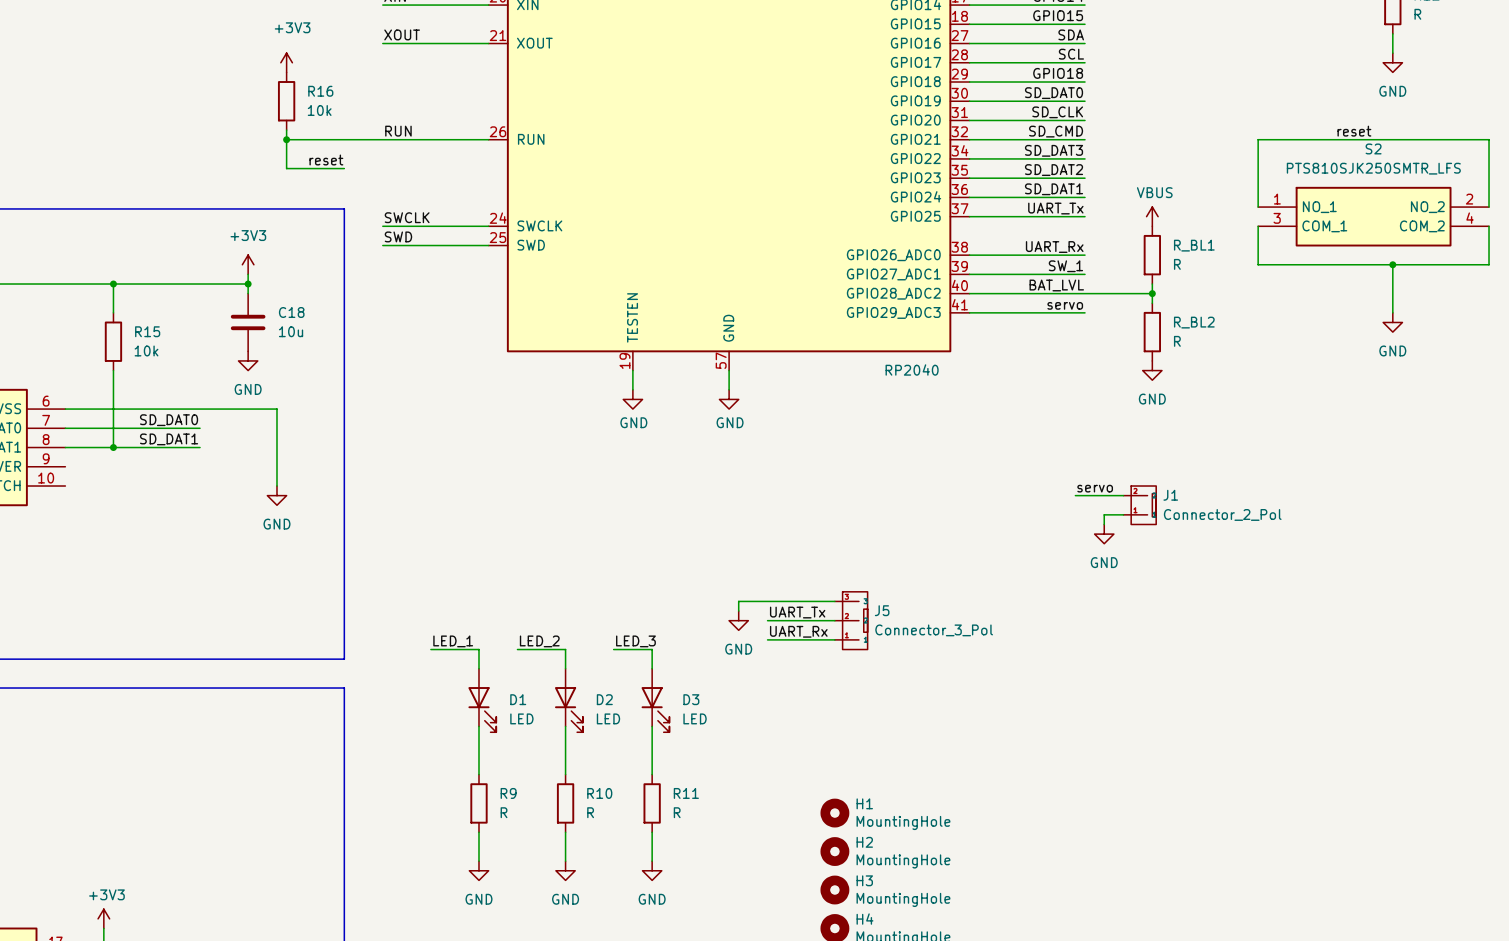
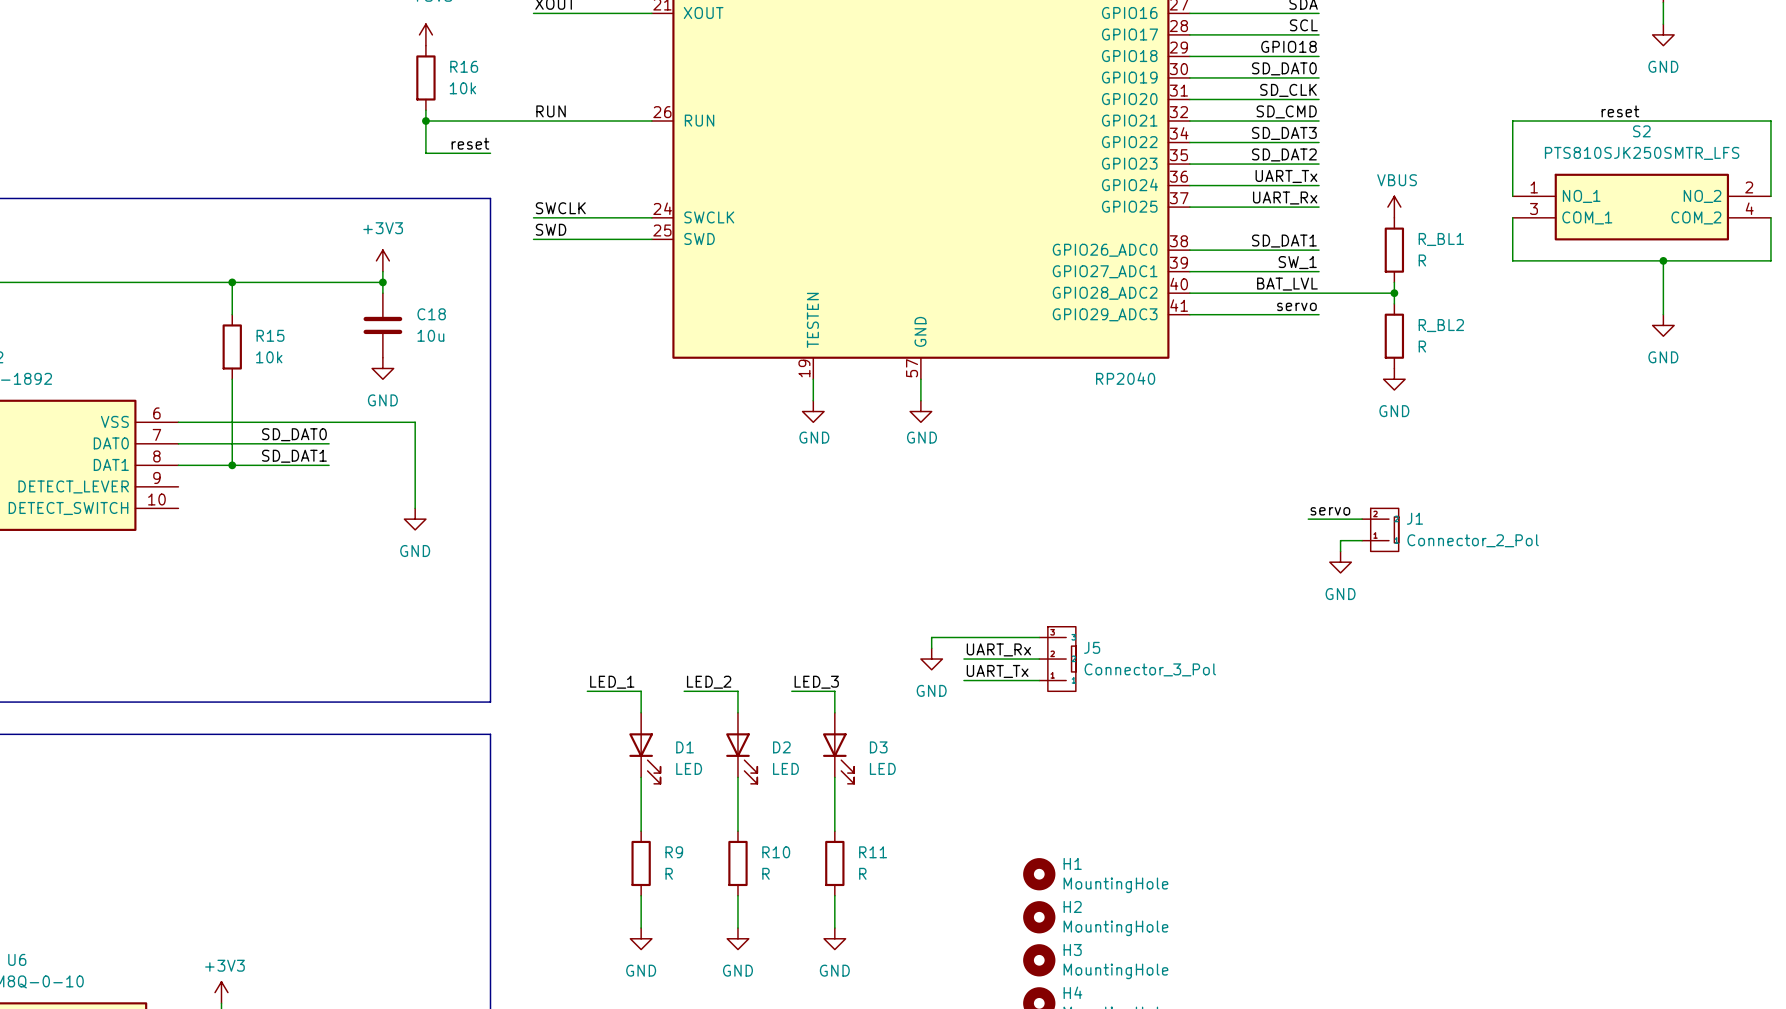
label: SD_DAT1 (1054, 189) -> UART_Tx (1286, 176)
label: UART_Tx (1055, 208) -> UART_Rx (1285, 197)
label: UART_Rx (1054, 247) -> SD_DAT1 (1284, 241)
label: UART_Tx (797, 612) -> UART_Rx (998, 649)
label: UART_Rx (798, 631) -> UART_Tx (997, 671)

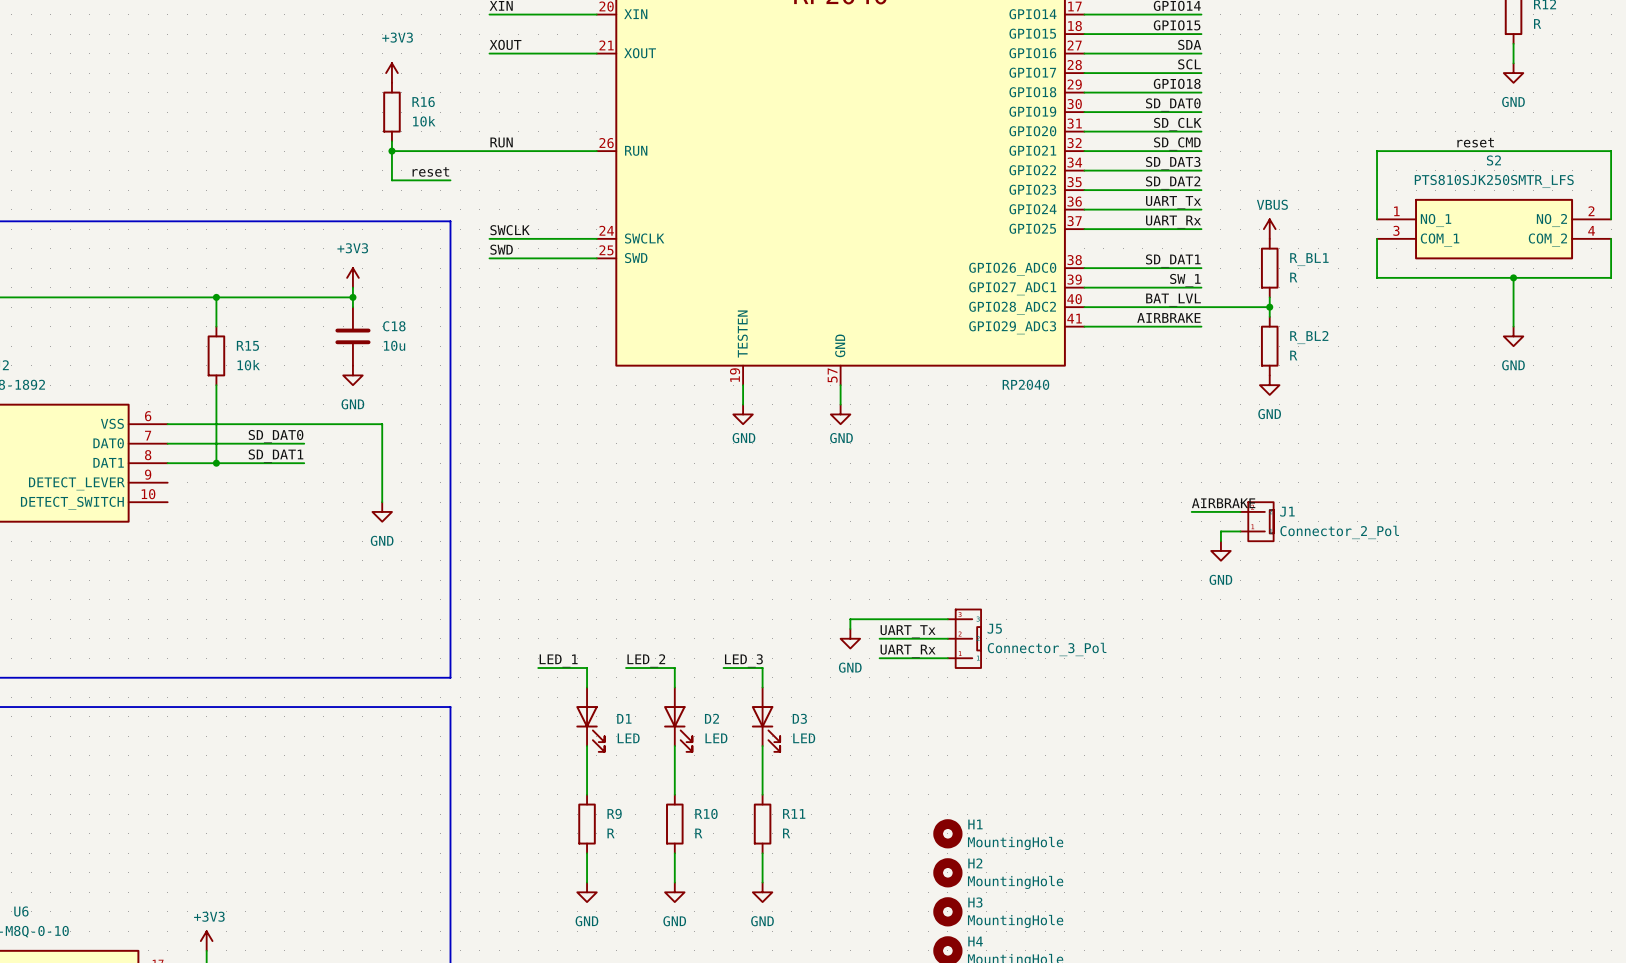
label: servo (1296, 306) -> AIRBRAKE (1168, 317)
label: servo (1330, 511) -> AIRBRAKE (1223, 503)
label: UART_Rx (998, 649) -> UART_Tx (908, 631)
label: UART_Tx (997, 671) -> UART_Rx (908, 651)

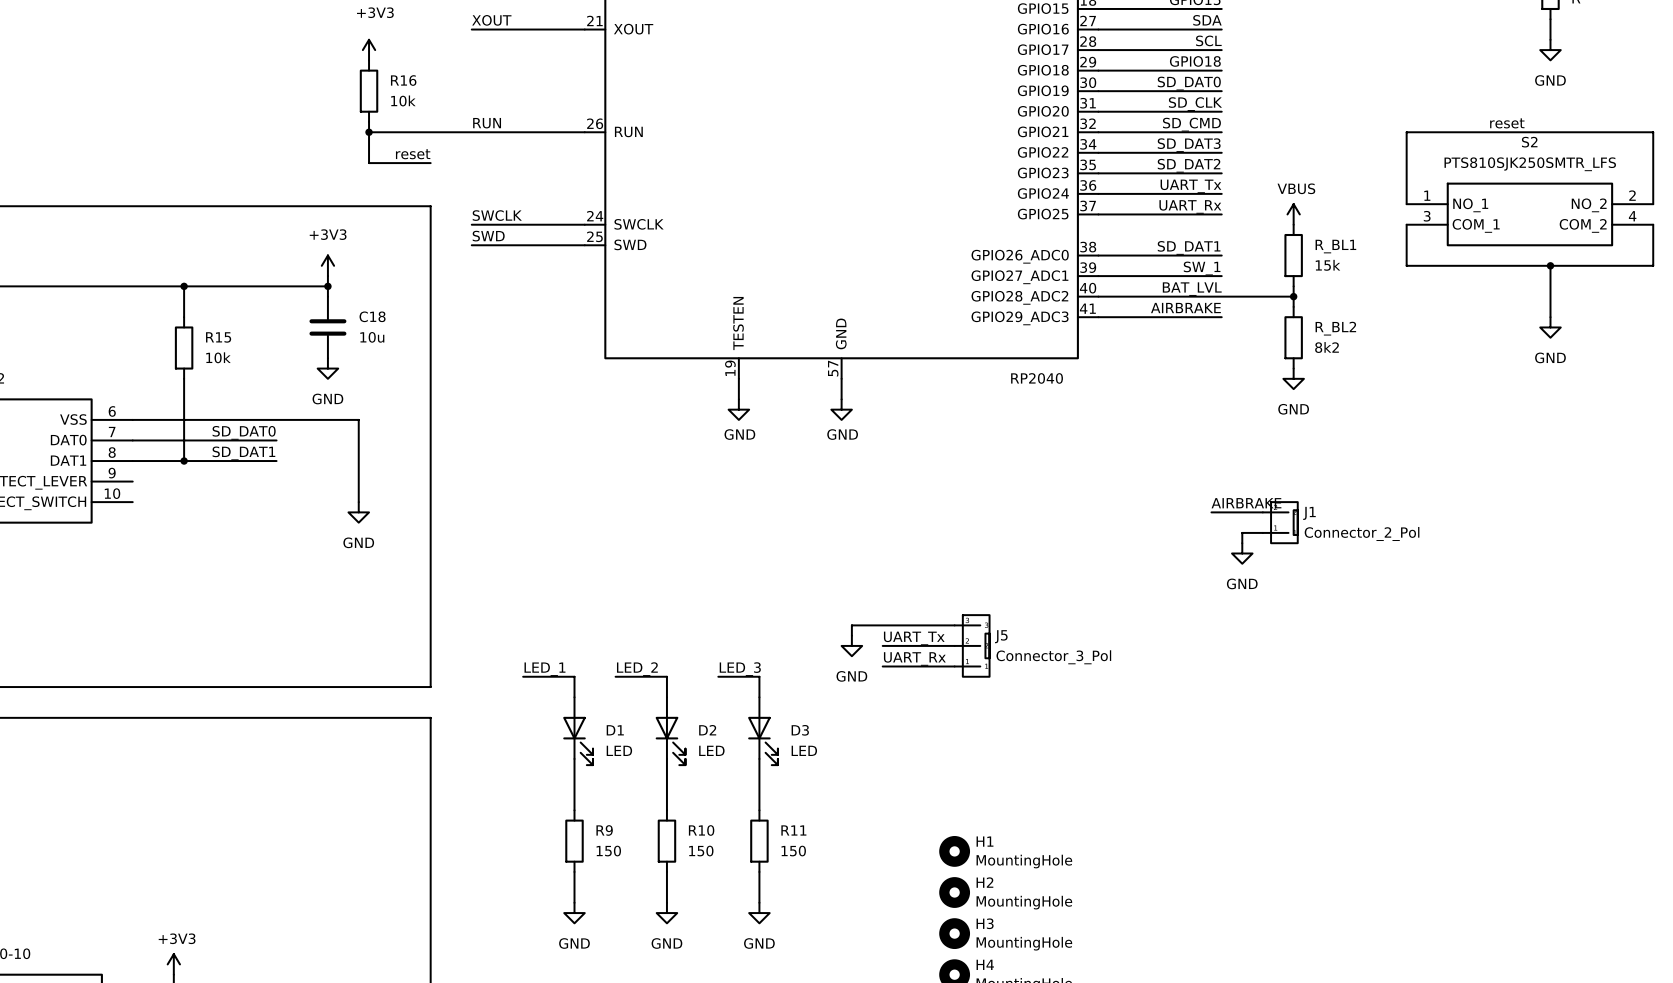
R_BL1 value: R (1293, 277) -> 15k (1328, 265)
R_BL2 value: R (1293, 355) -> 8k2 (1327, 347)
R9 value: R (611, 833) -> 150 (608, 851)
R10 value: R (698, 833) -> 150 (701, 851)
R11 value: R (786, 833) -> 150 (793, 851)

